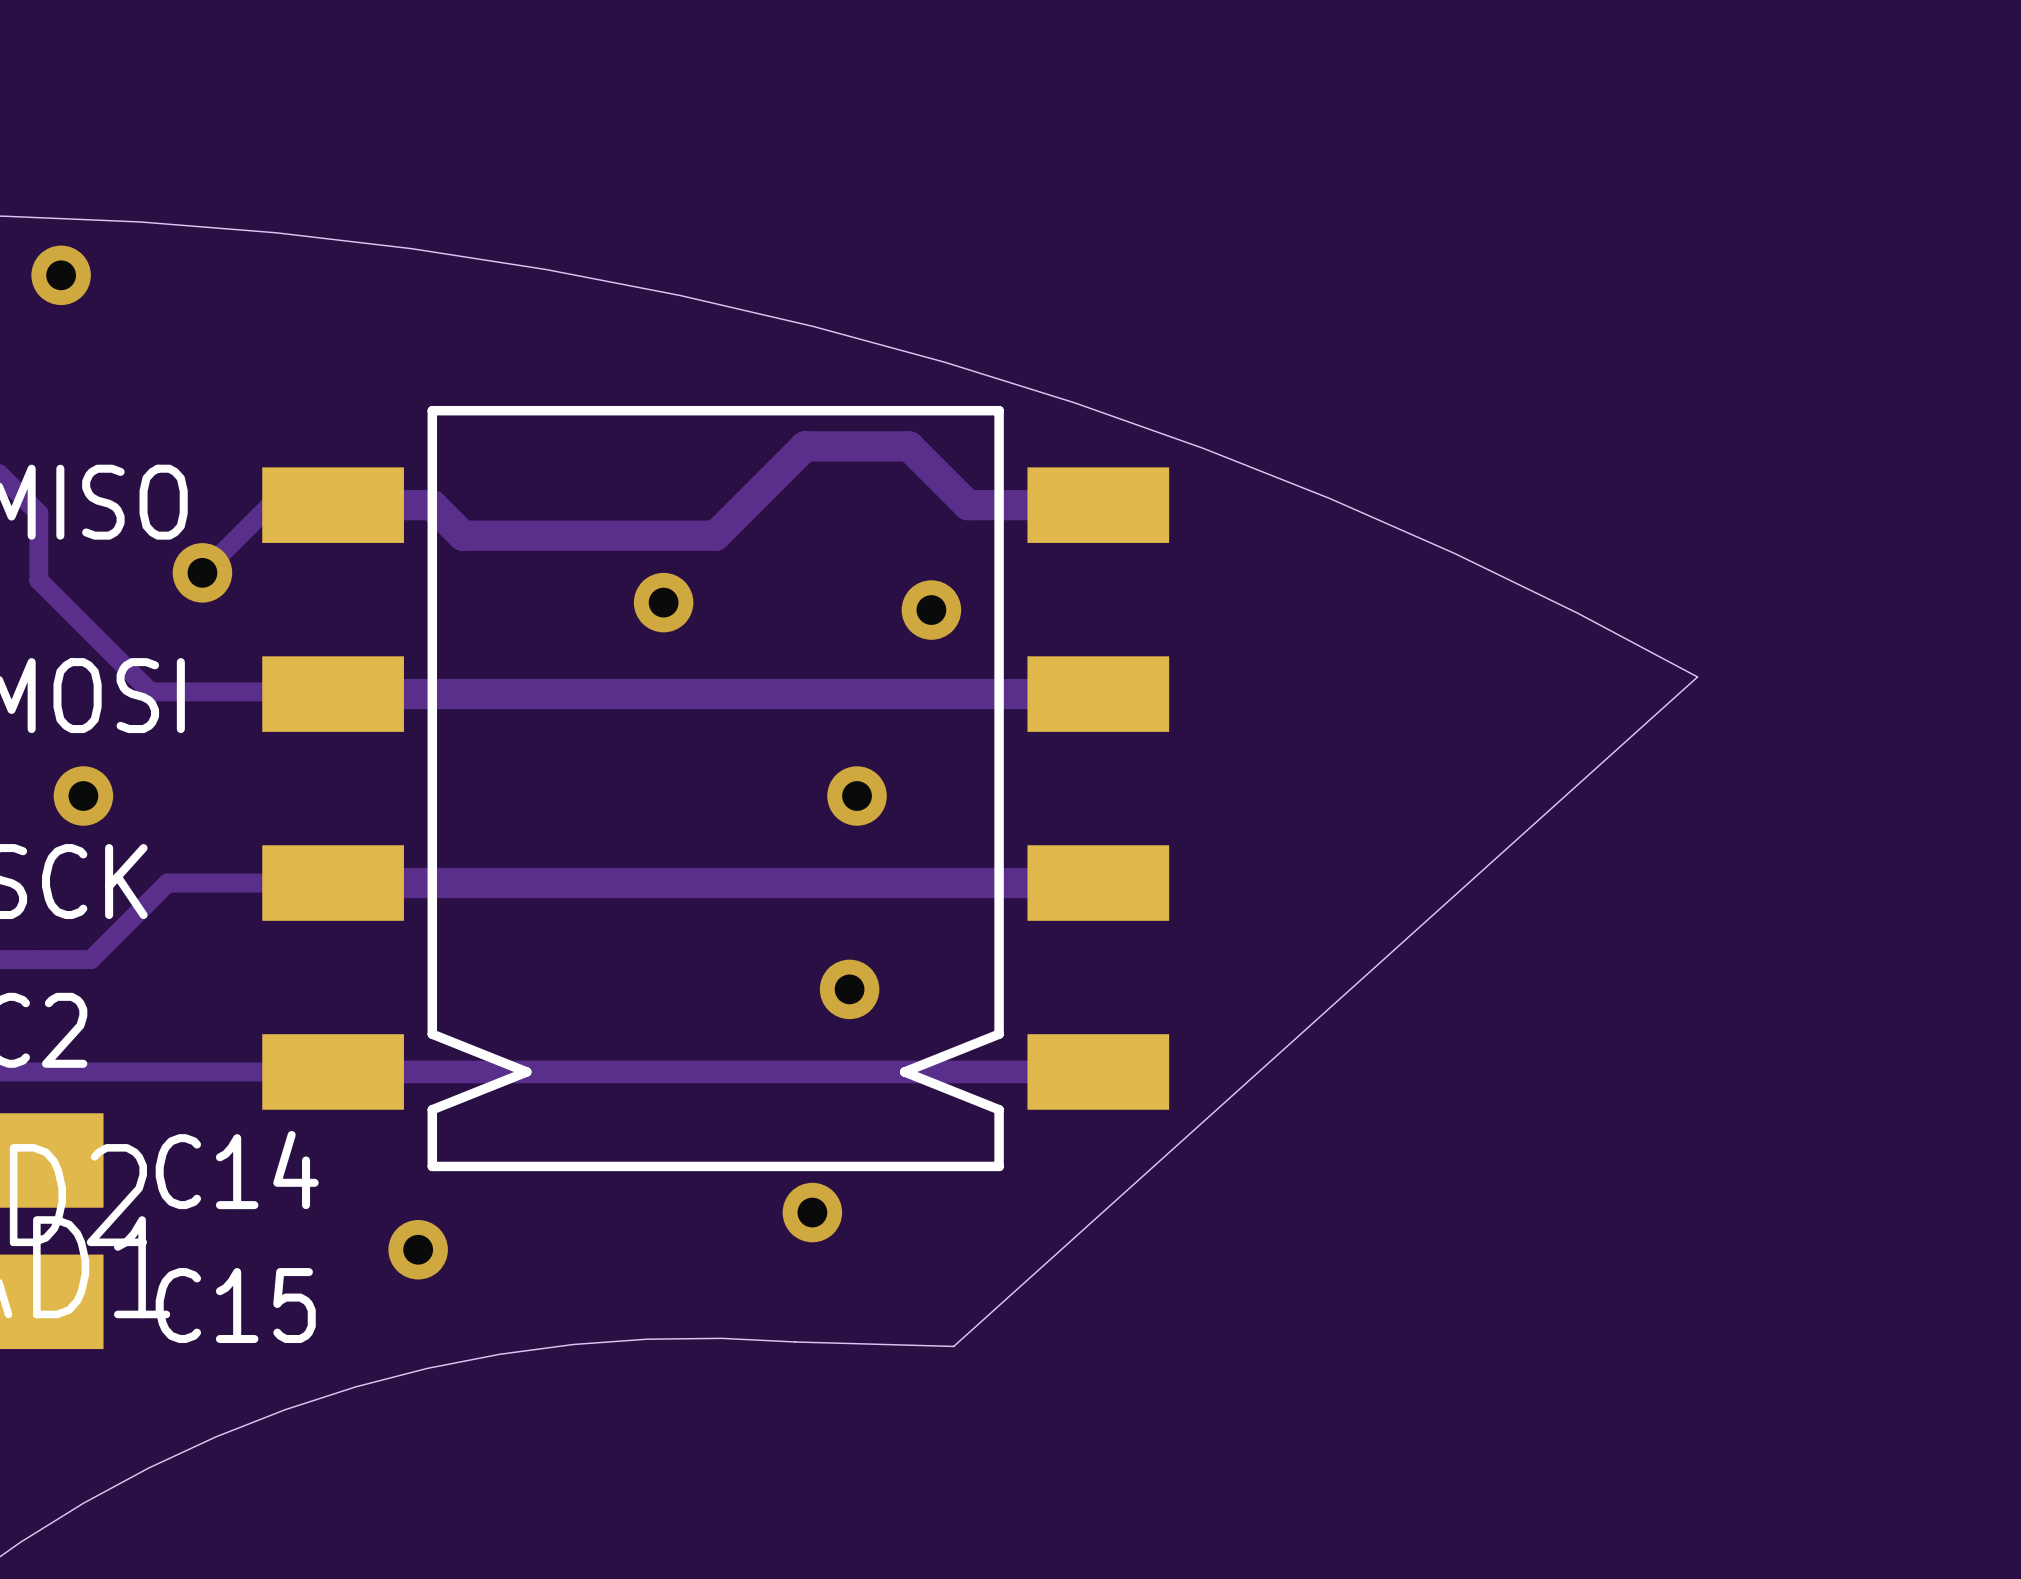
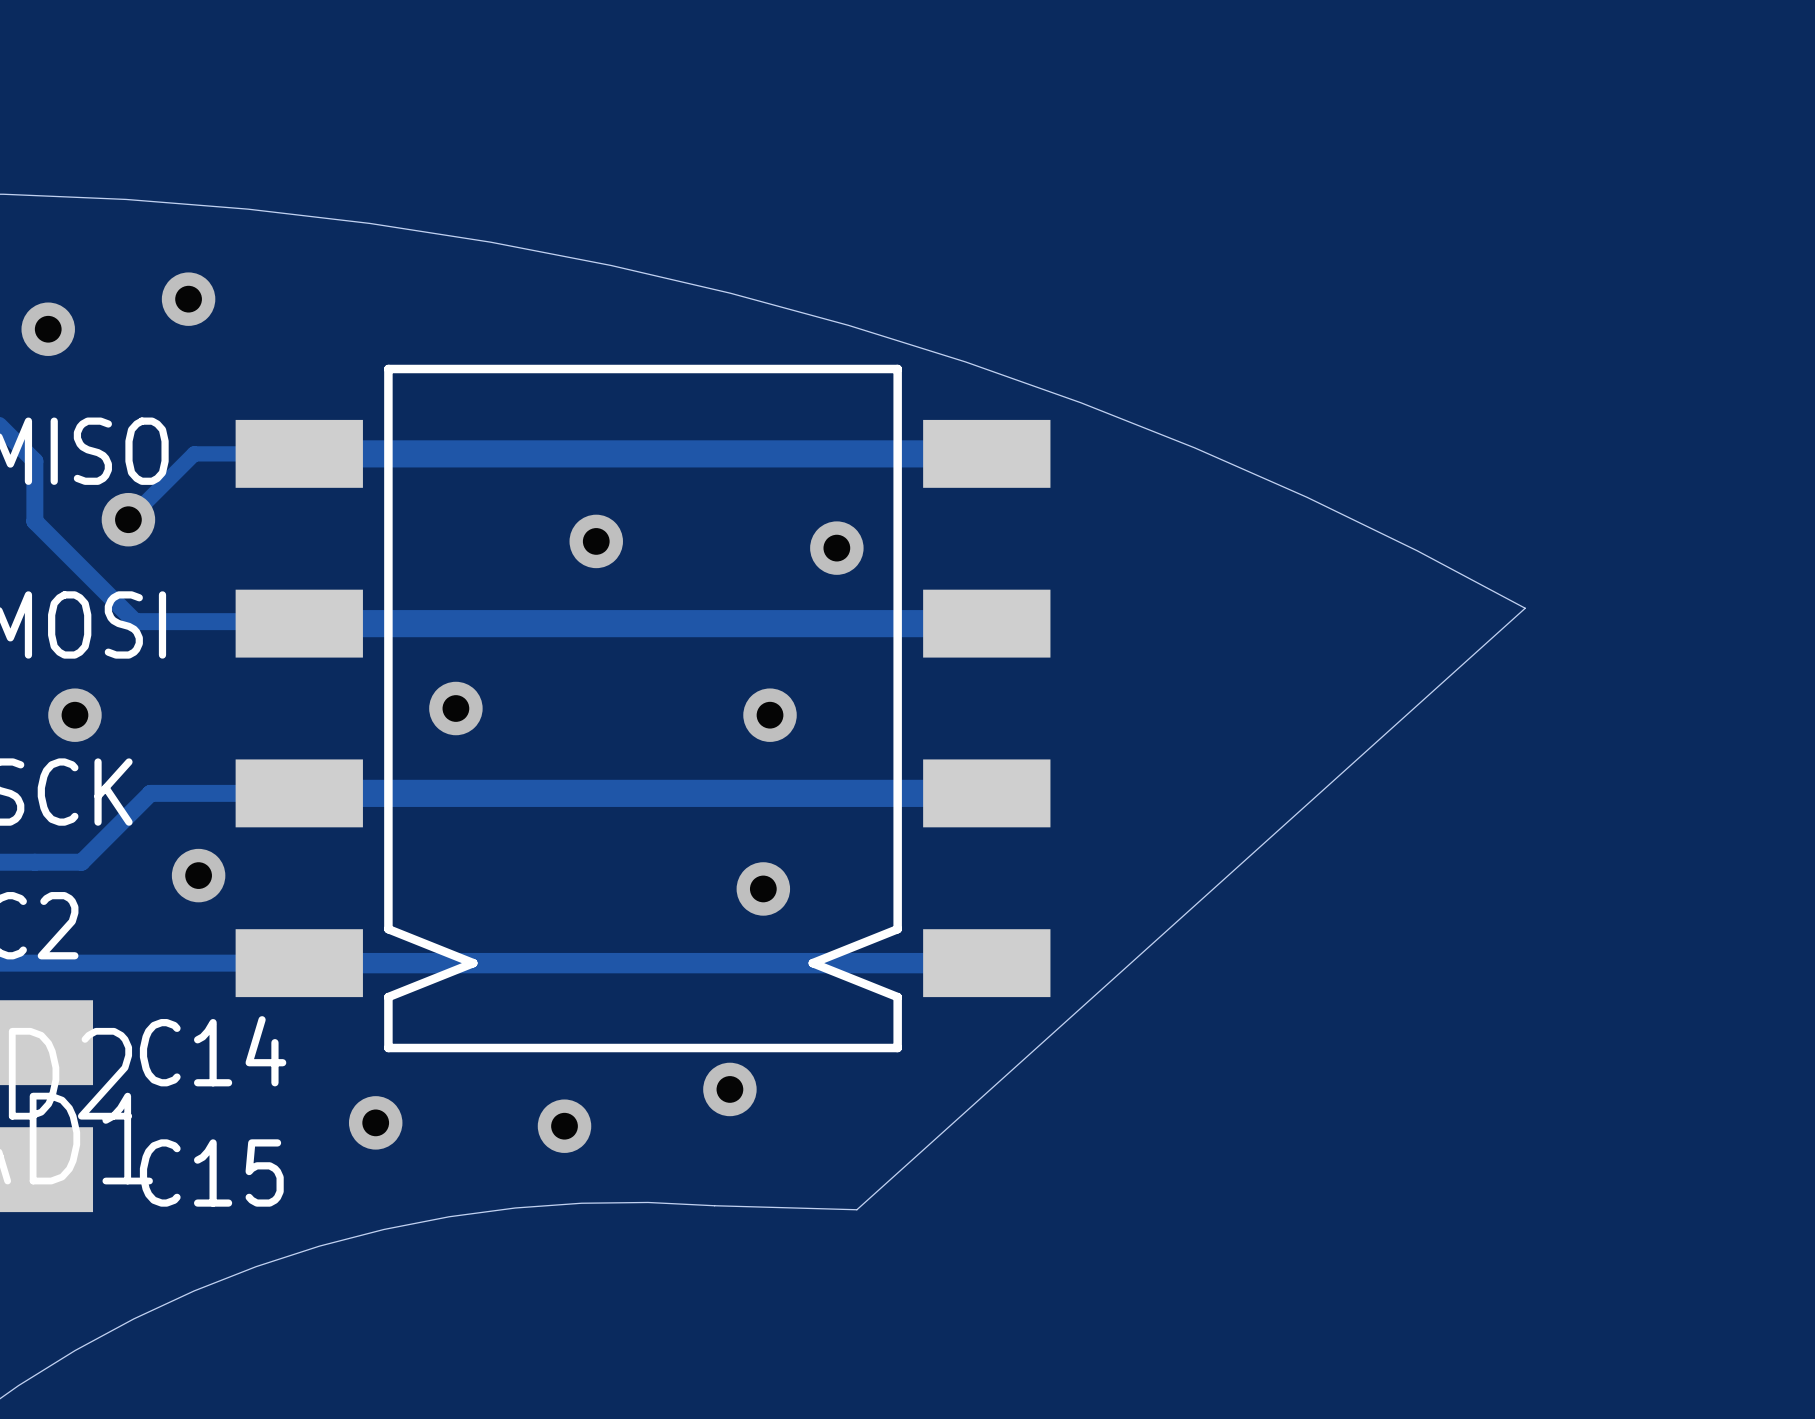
via: (61, 275) -> none
via: none -> (188, 299)
via: none -> (48, 329)
track: (270, 505) (202, 572) -> (242, 453) (194, 453) (128, 519)
track: (967, 505) (909, 446) (804, 446) (715, 535) (462, 535) (432, 505) -> (869, 453) (388, 453)
via position: (202, 572) -> (128, 519)
via: none -> (455, 708)
via: none -> (198, 875)
via: none -> (564, 1126)

